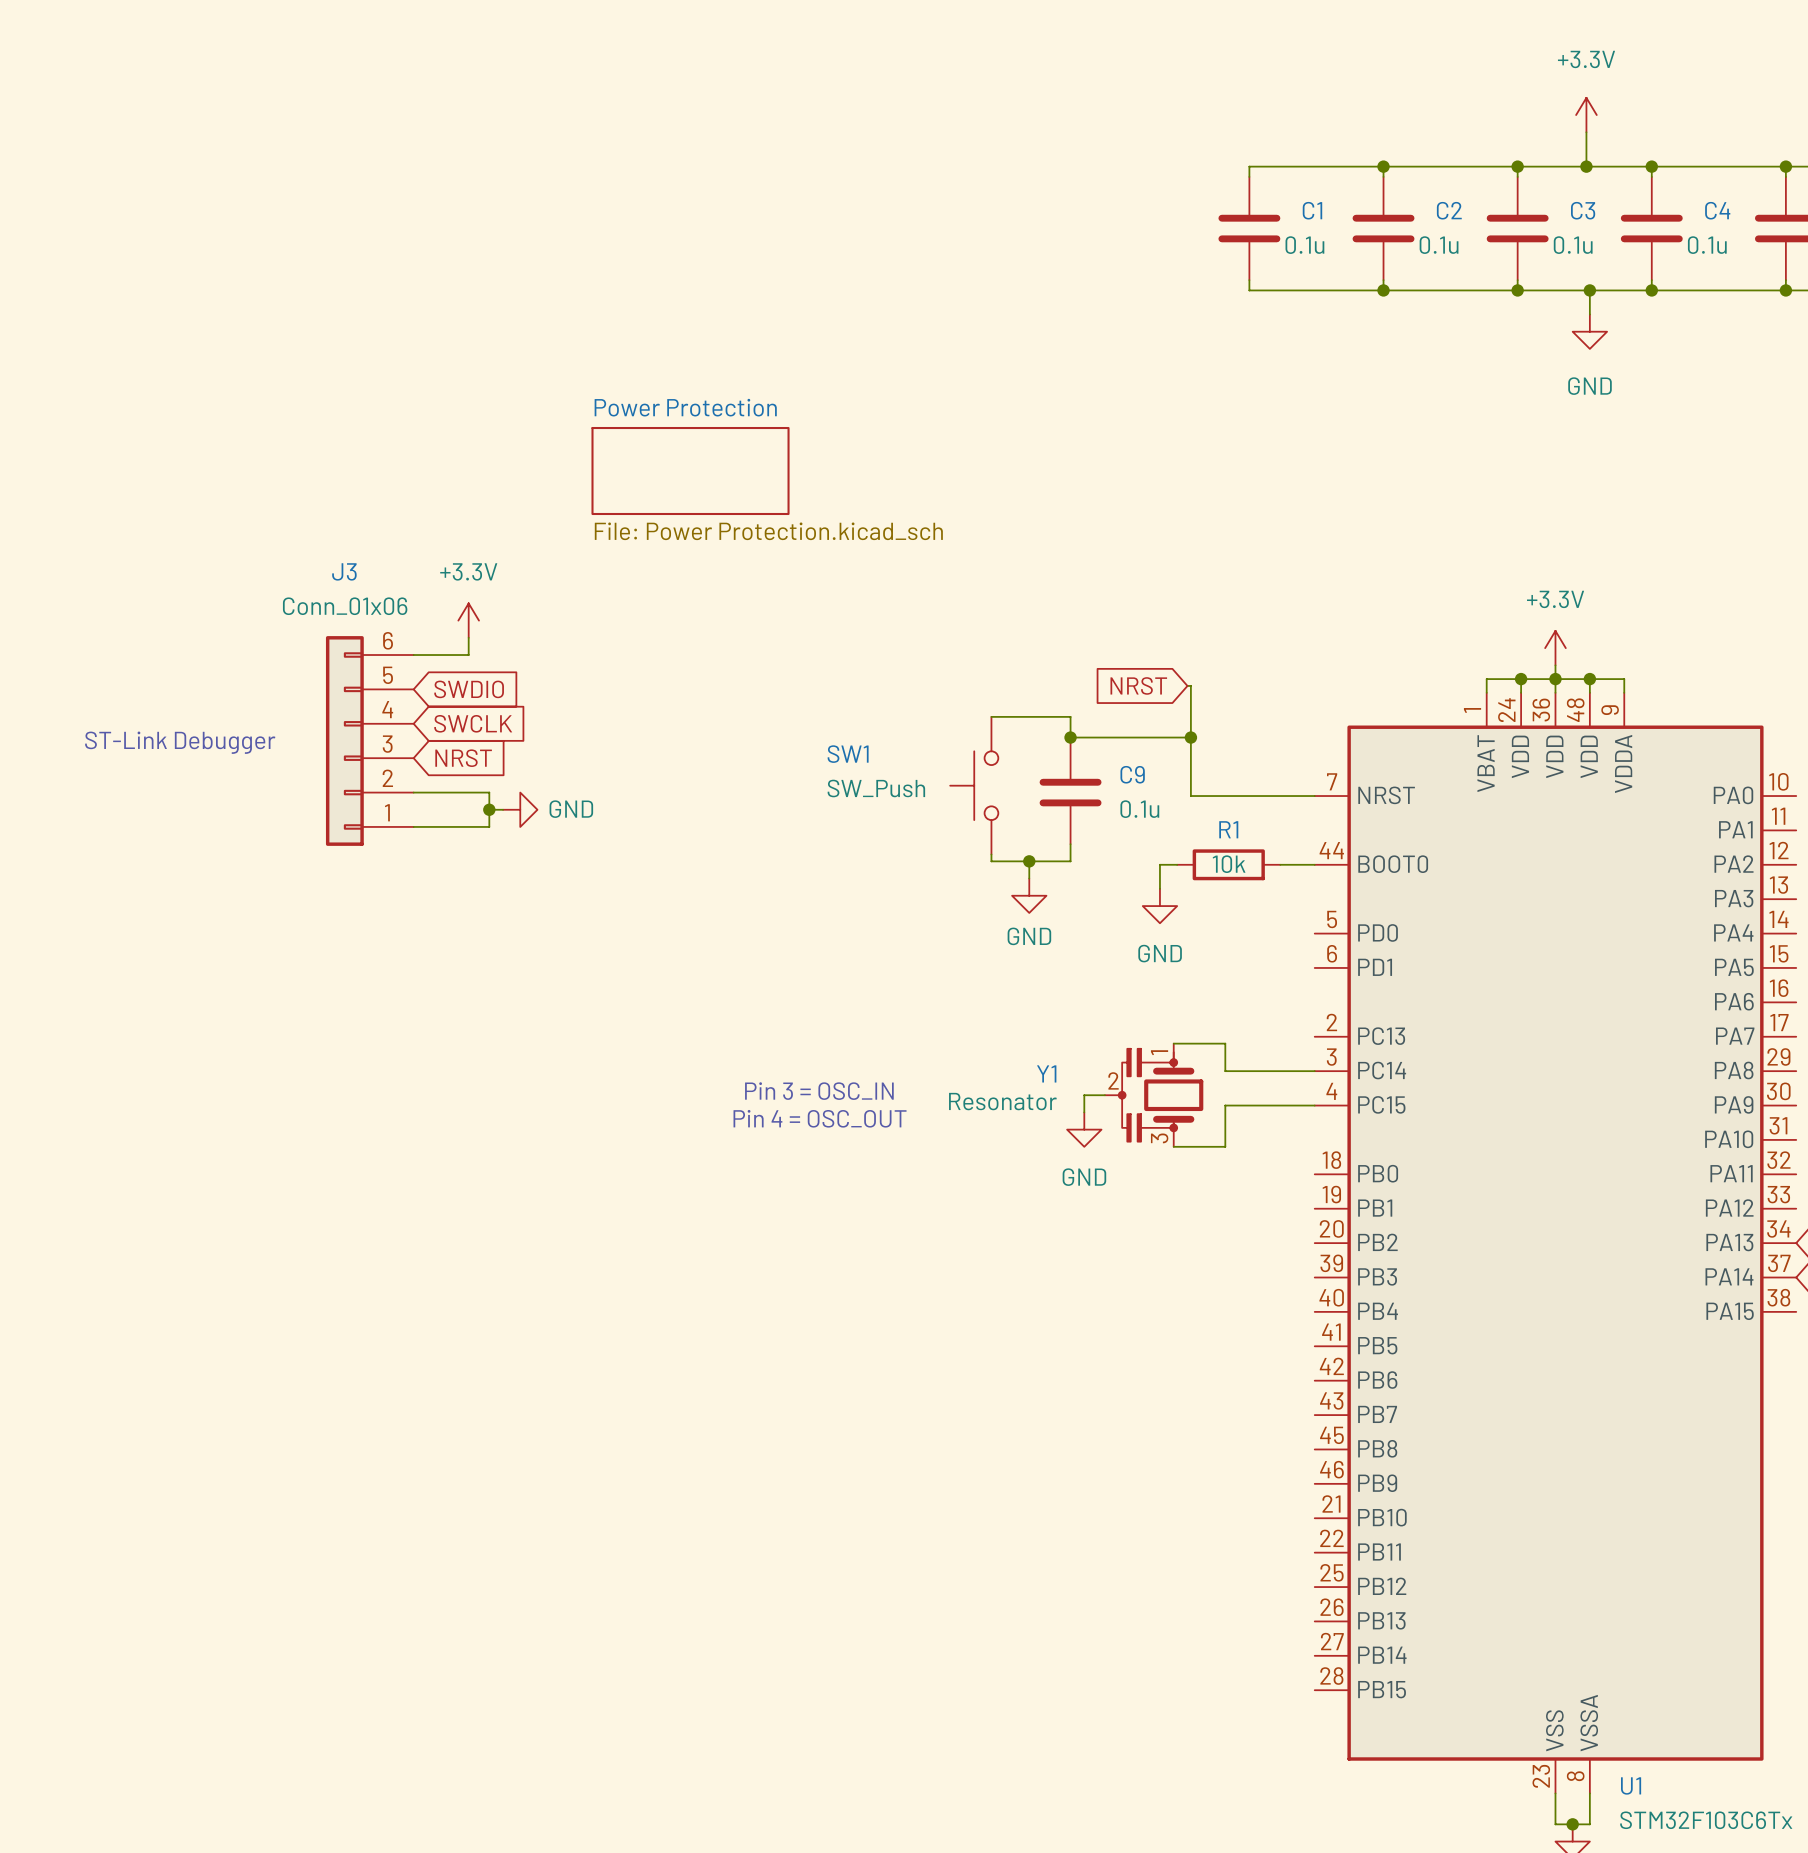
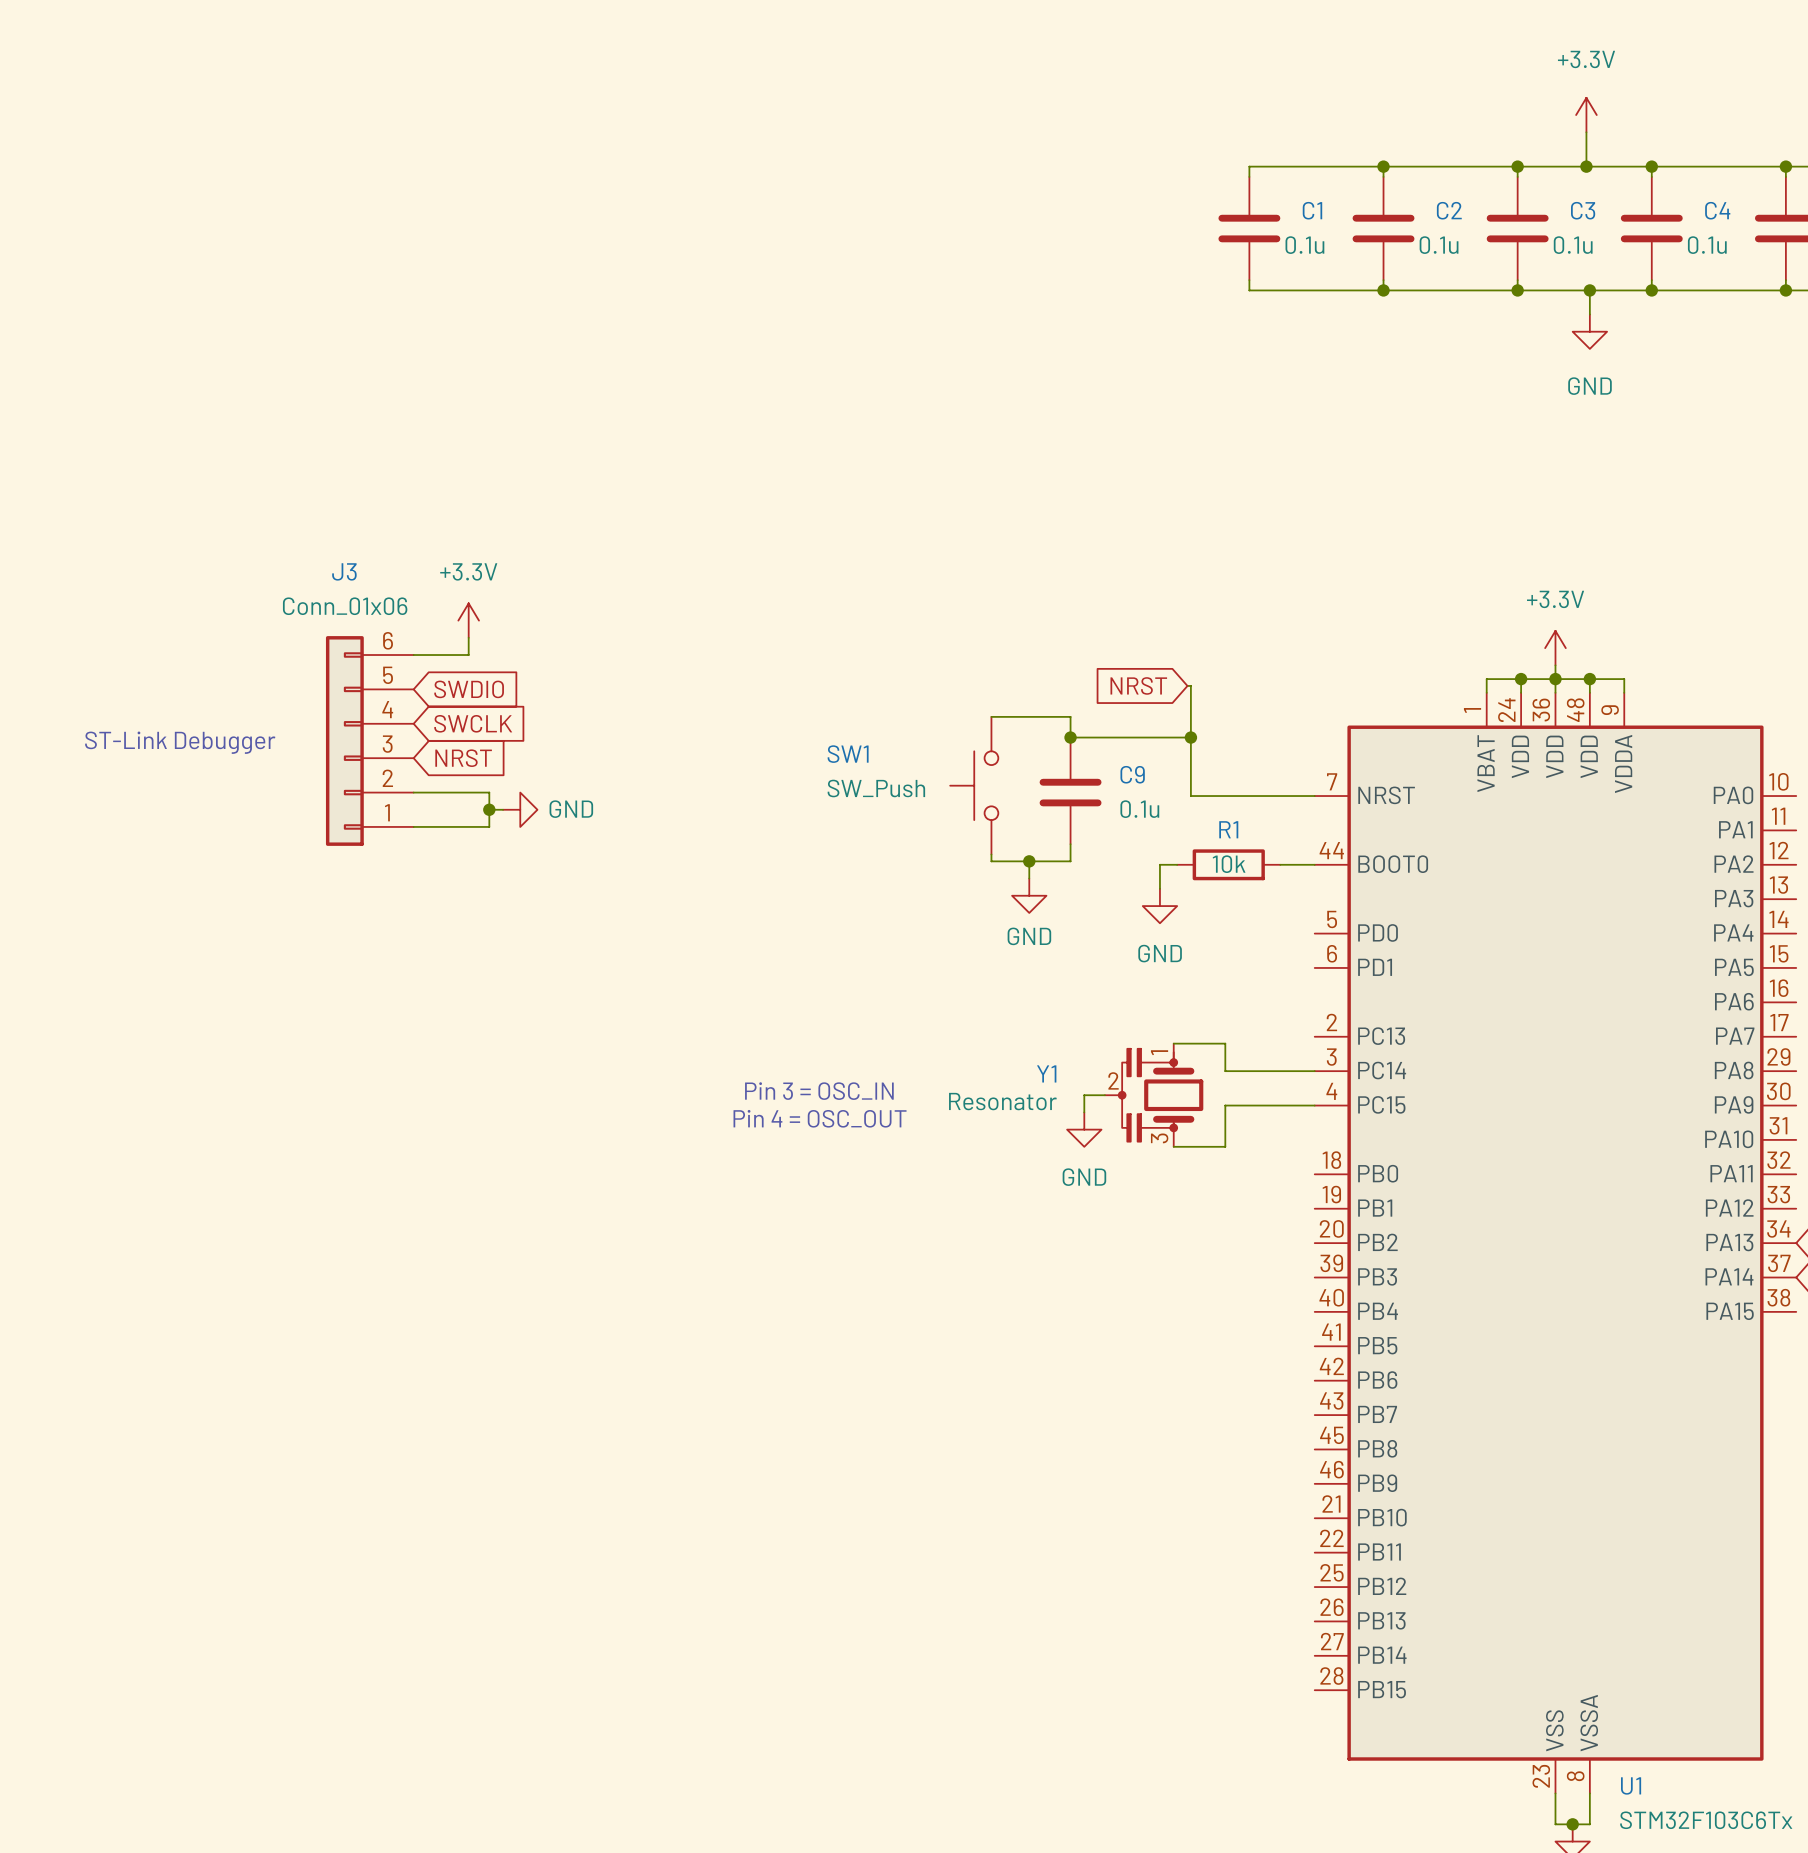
sheet Power Protection: File: Power Protection.kicad_sch (690, 471) -> none

